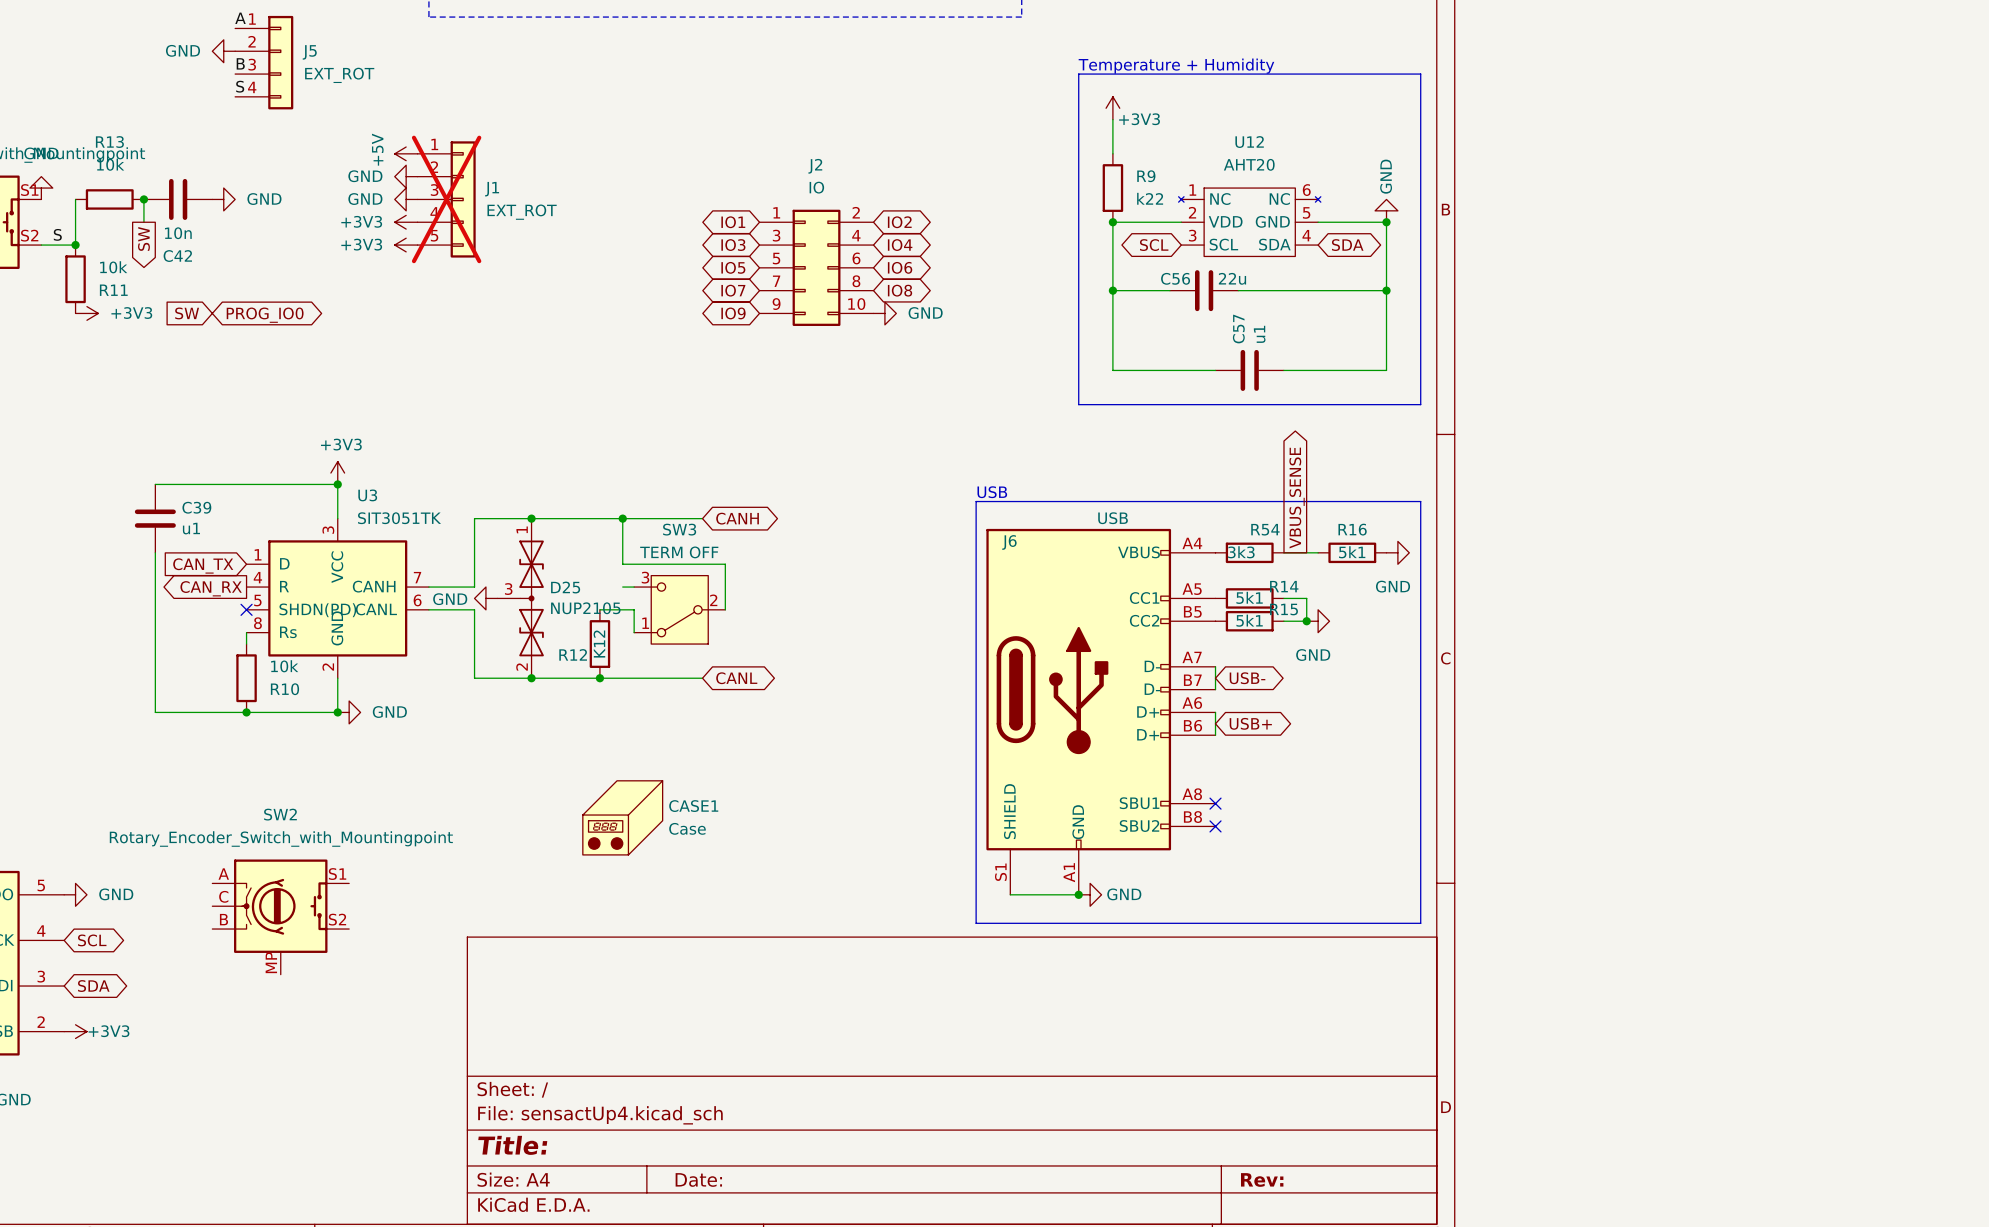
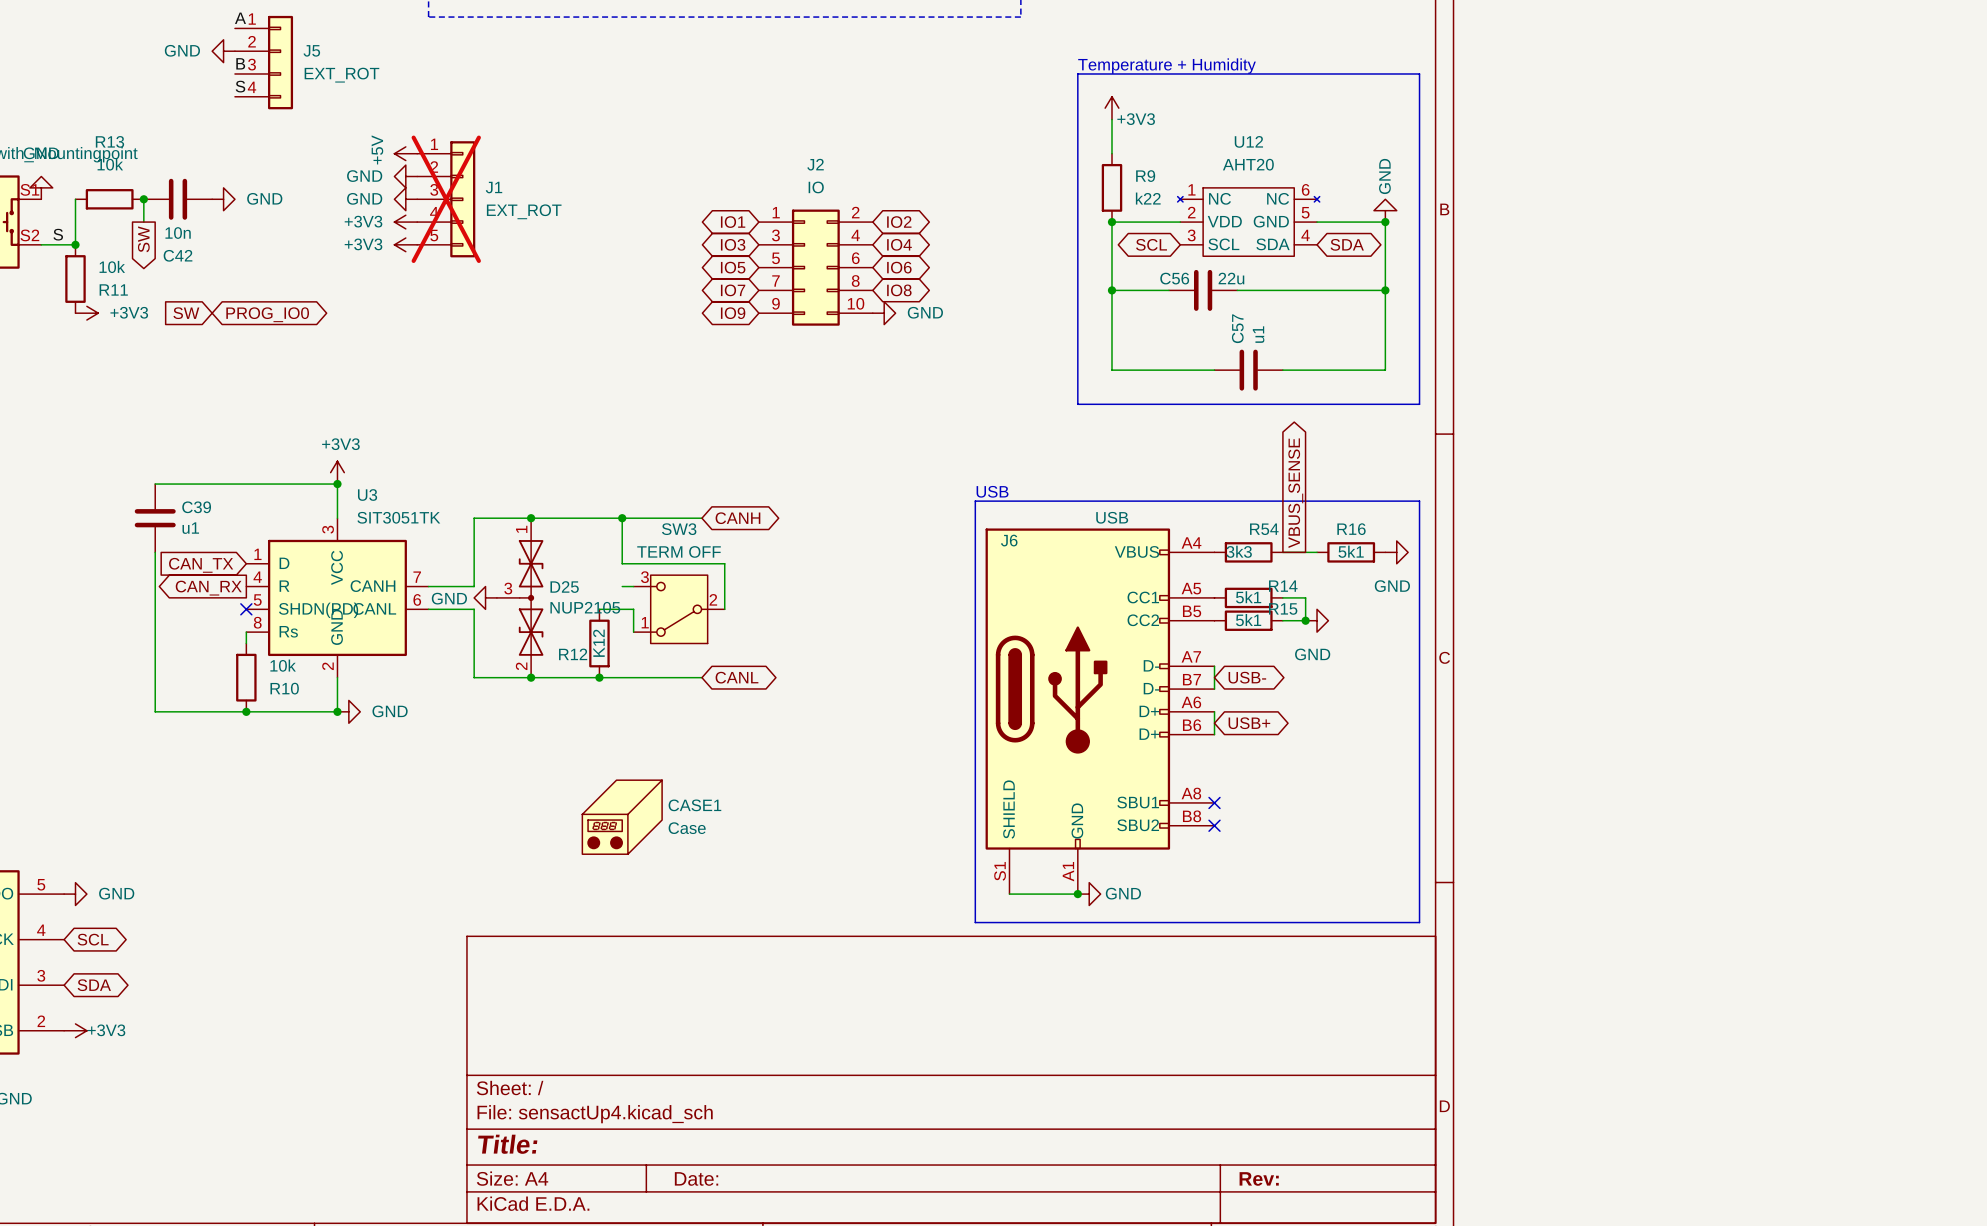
SW2: Rotary_Encoder_Switch_with_Mountingpoint (280, 917) -> none

